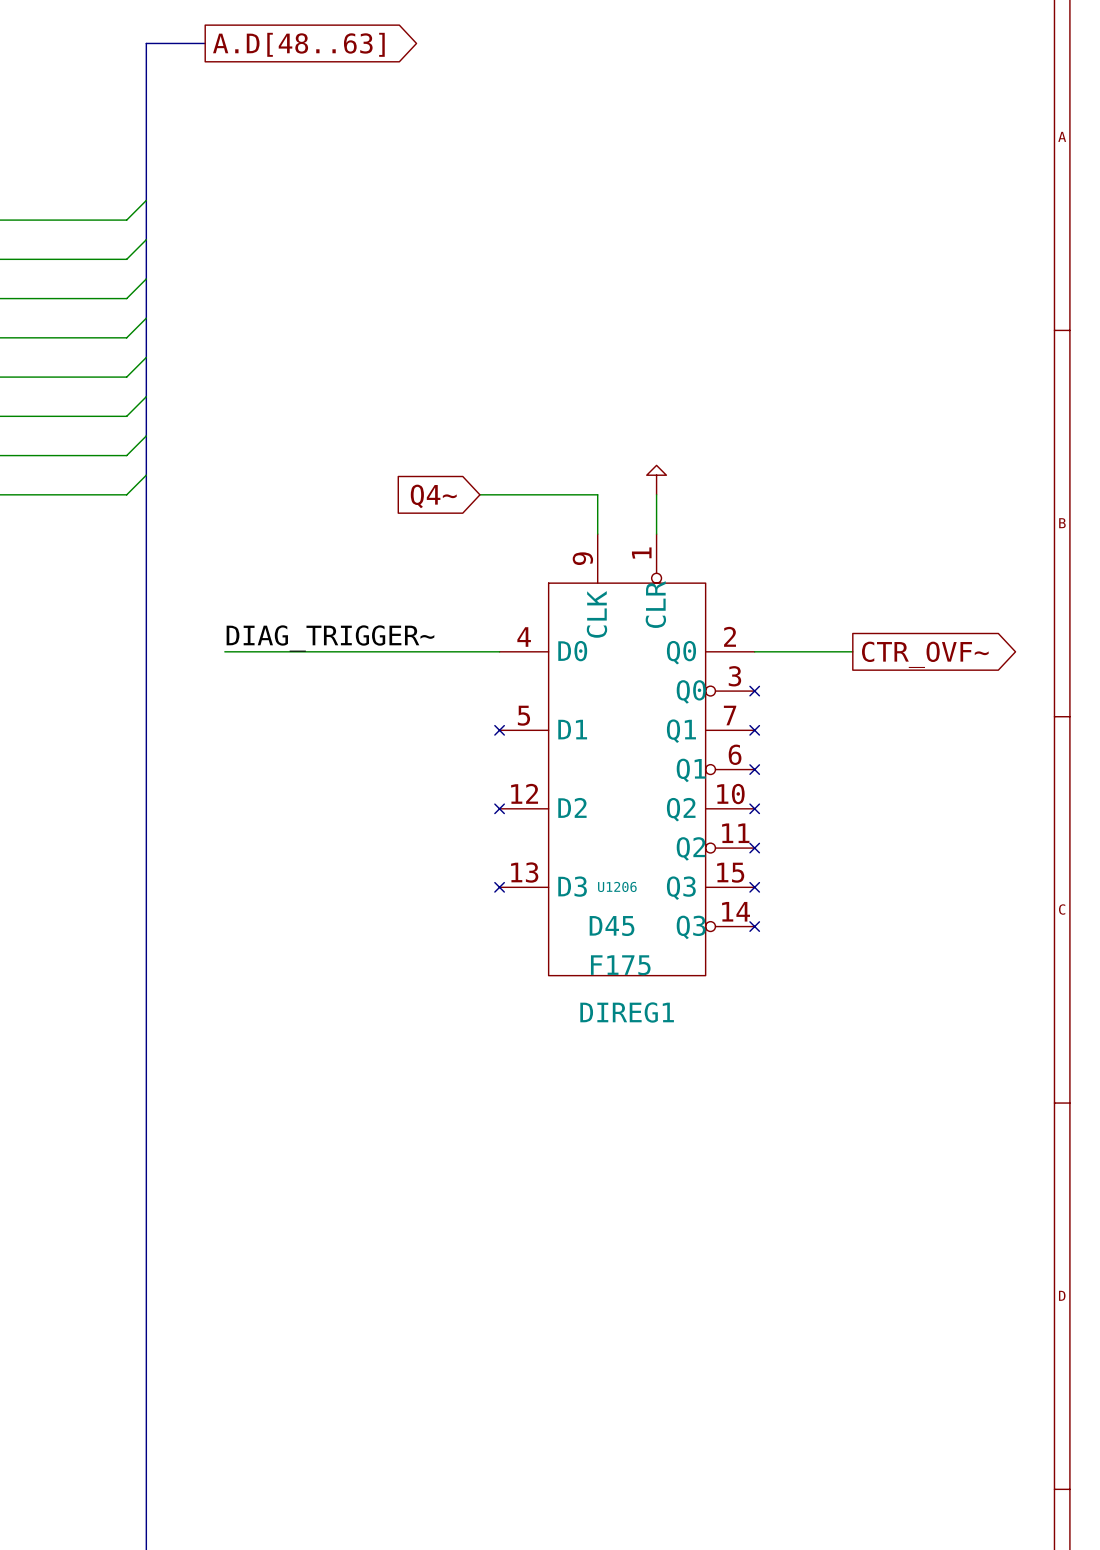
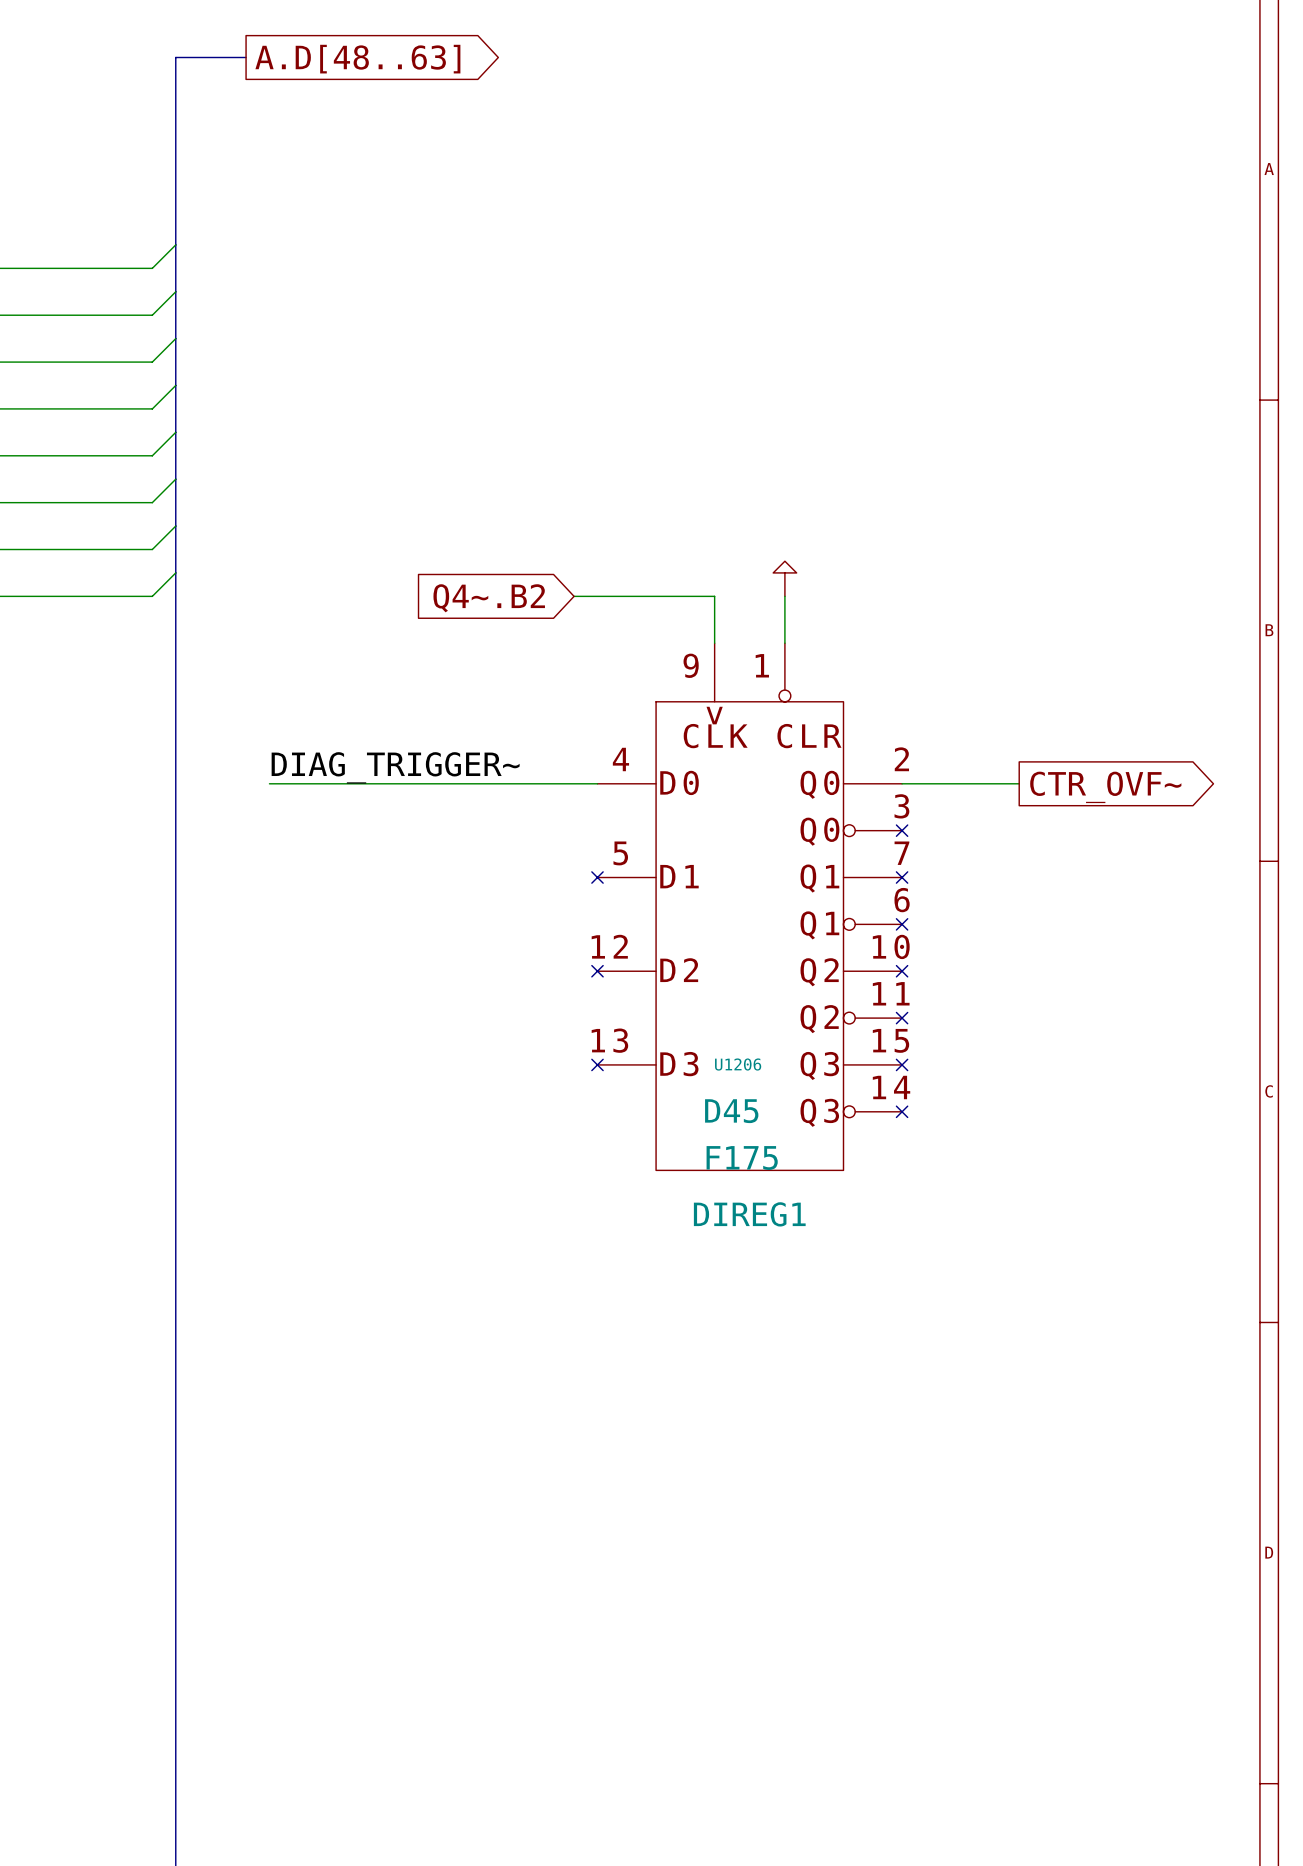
global label: Q4~ (433, 496) -> Q4~.B2 (489, 598)
U1206 symbol: [499, 534, 755, 976] -> [597, 643, 903, 1171]

